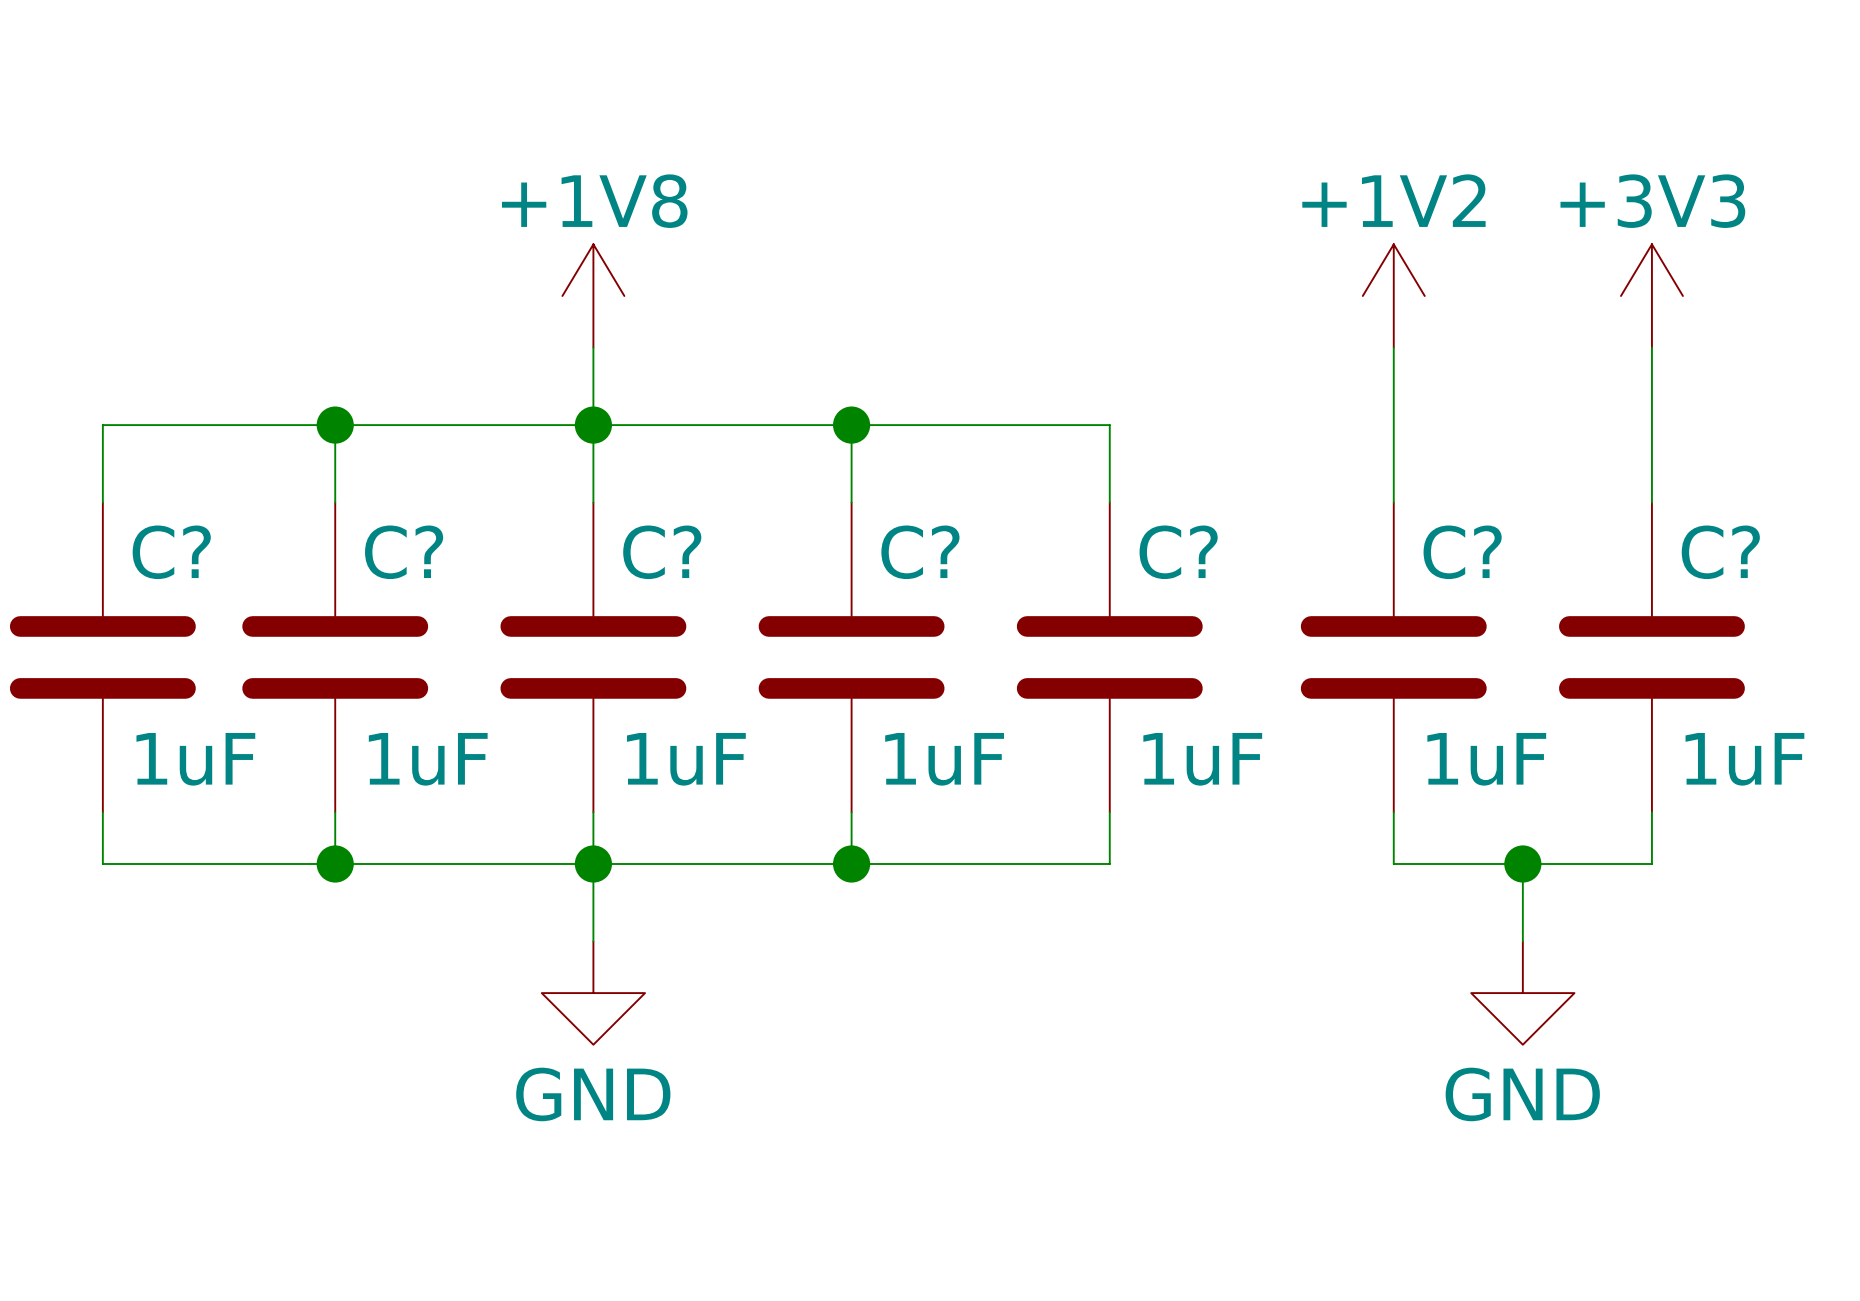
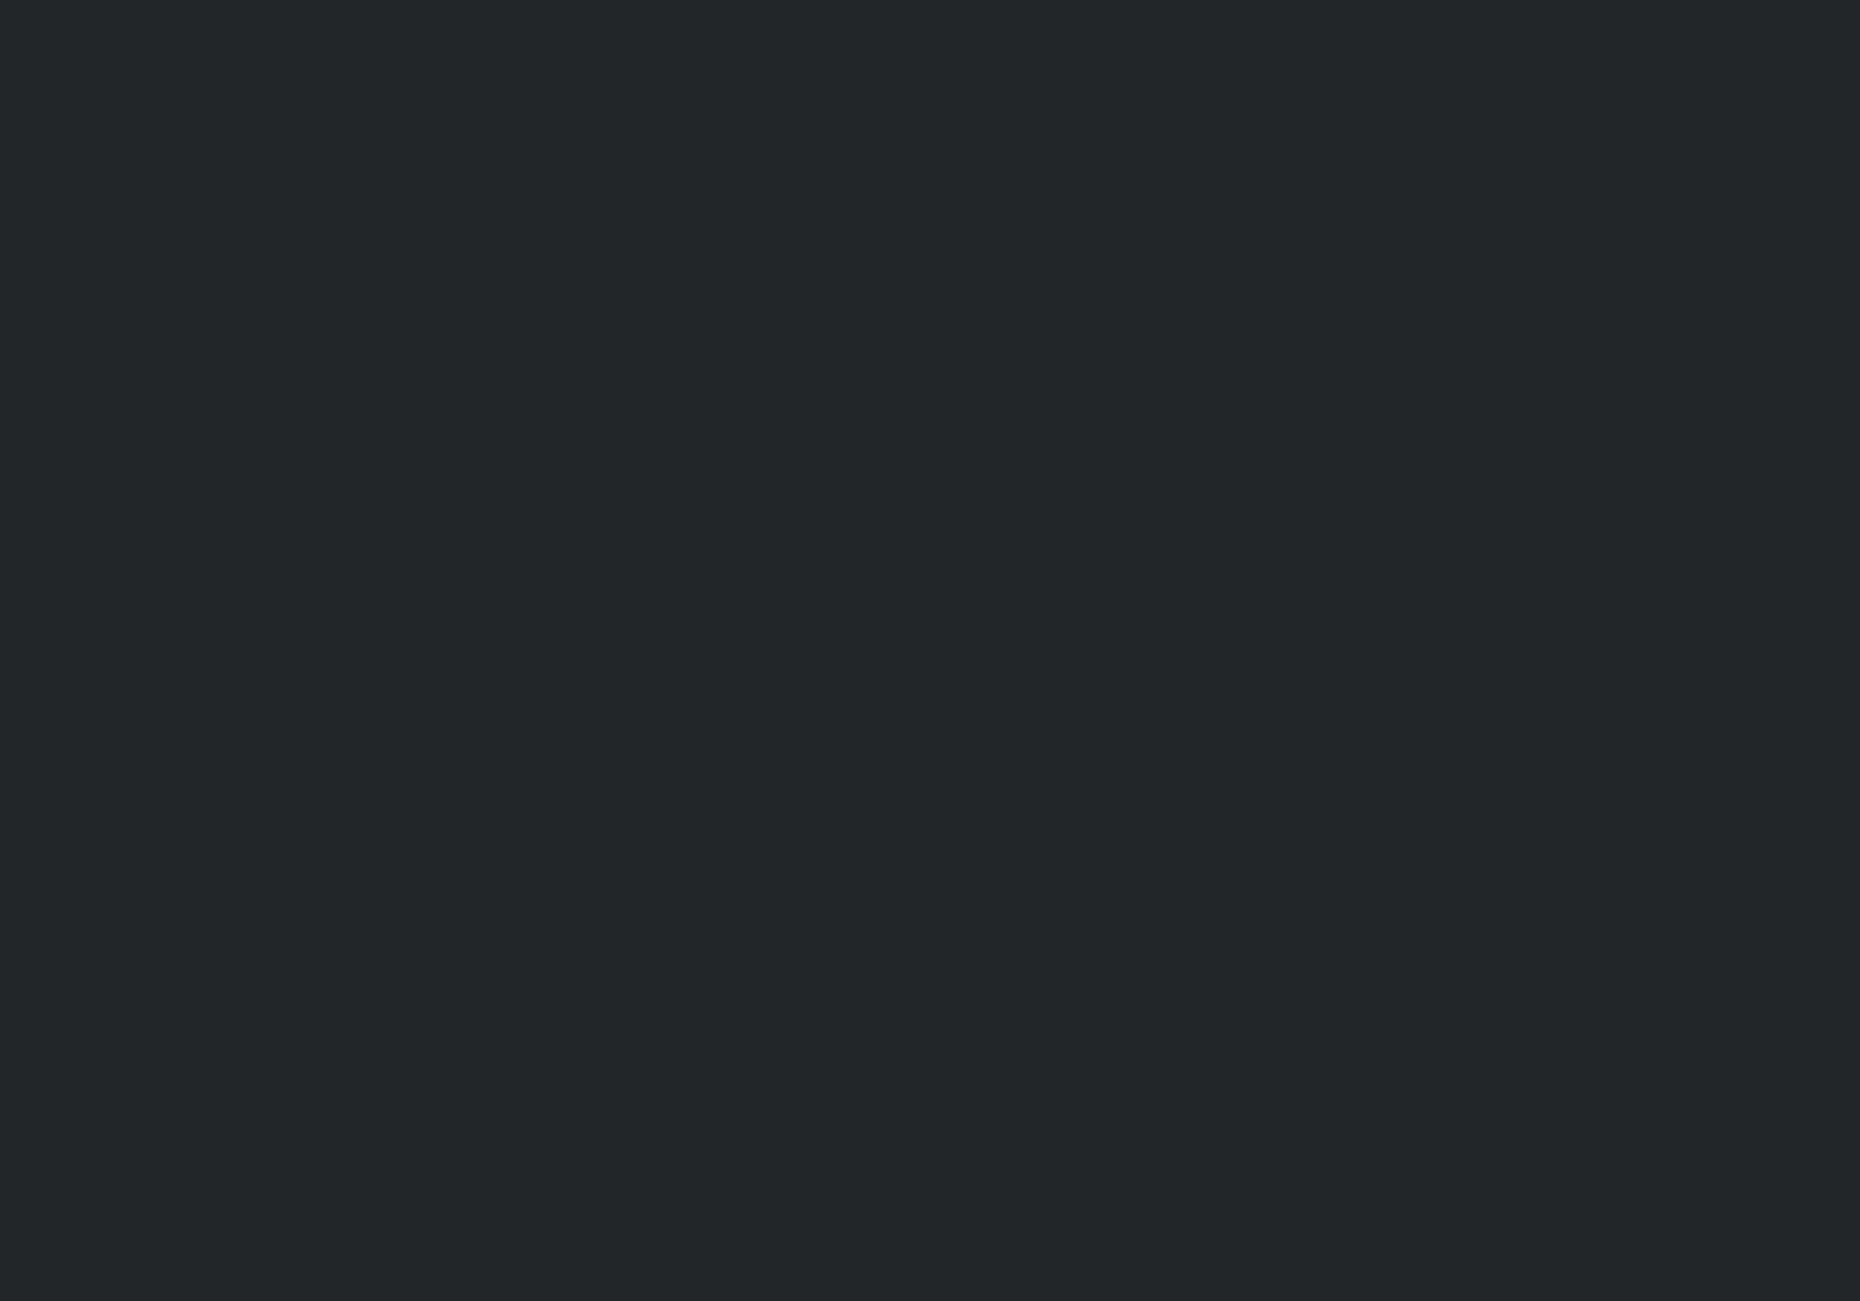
power symbol: +1V8 (593, 295) -> none
power symbol: +1V2 (1393, 295) -> none
power symbol: +3V3 (1651, 295) -> none
wire: (593, 347) (593, 502) -> none
wire: (1393, 347) (1393, 502) -> none
wire: (1651, 347) (1651, 502) -> none
wire: (335, 425) (335, 502) -> none
junction: (335, 425) -> none
junction: (593, 425) -> none
wire: (851, 425) (851, 502) -> none
junction: (851, 425) -> none
wire: (102, 502) (102, 425) (1109, 425) (1109, 502) -> none
C?: 1uF (102, 657) -> none
C?: 1uF (335, 657) -> none
C?: 1uF (593, 657) -> none
C?: 1uF (851, 657) -> none
C?: 1uF (1109, 657) -> none
C?: 1uF (1393, 657) -> none
C?: 1uF (1651, 657) -> none
wire: (102, 812) (102, 863) (1109, 863) (1109, 812) -> none
wire: (335, 812) (335, 863) -> none
wire: (593, 812) (593, 941) -> none
wire: (851, 812) (851, 863) -> none
wire: (1393, 812) (1393, 863) (1651, 863) (1651, 812) -> none
junction: (335, 863) -> none
junction: (593, 863) -> none
junction: (851, 863) -> none
wire: (1522, 863) (1522, 941) -> none
junction: (1522, 863) -> none
power symbol: GND (593, 993) -> none
power symbol: GND (1522, 993) -> none

